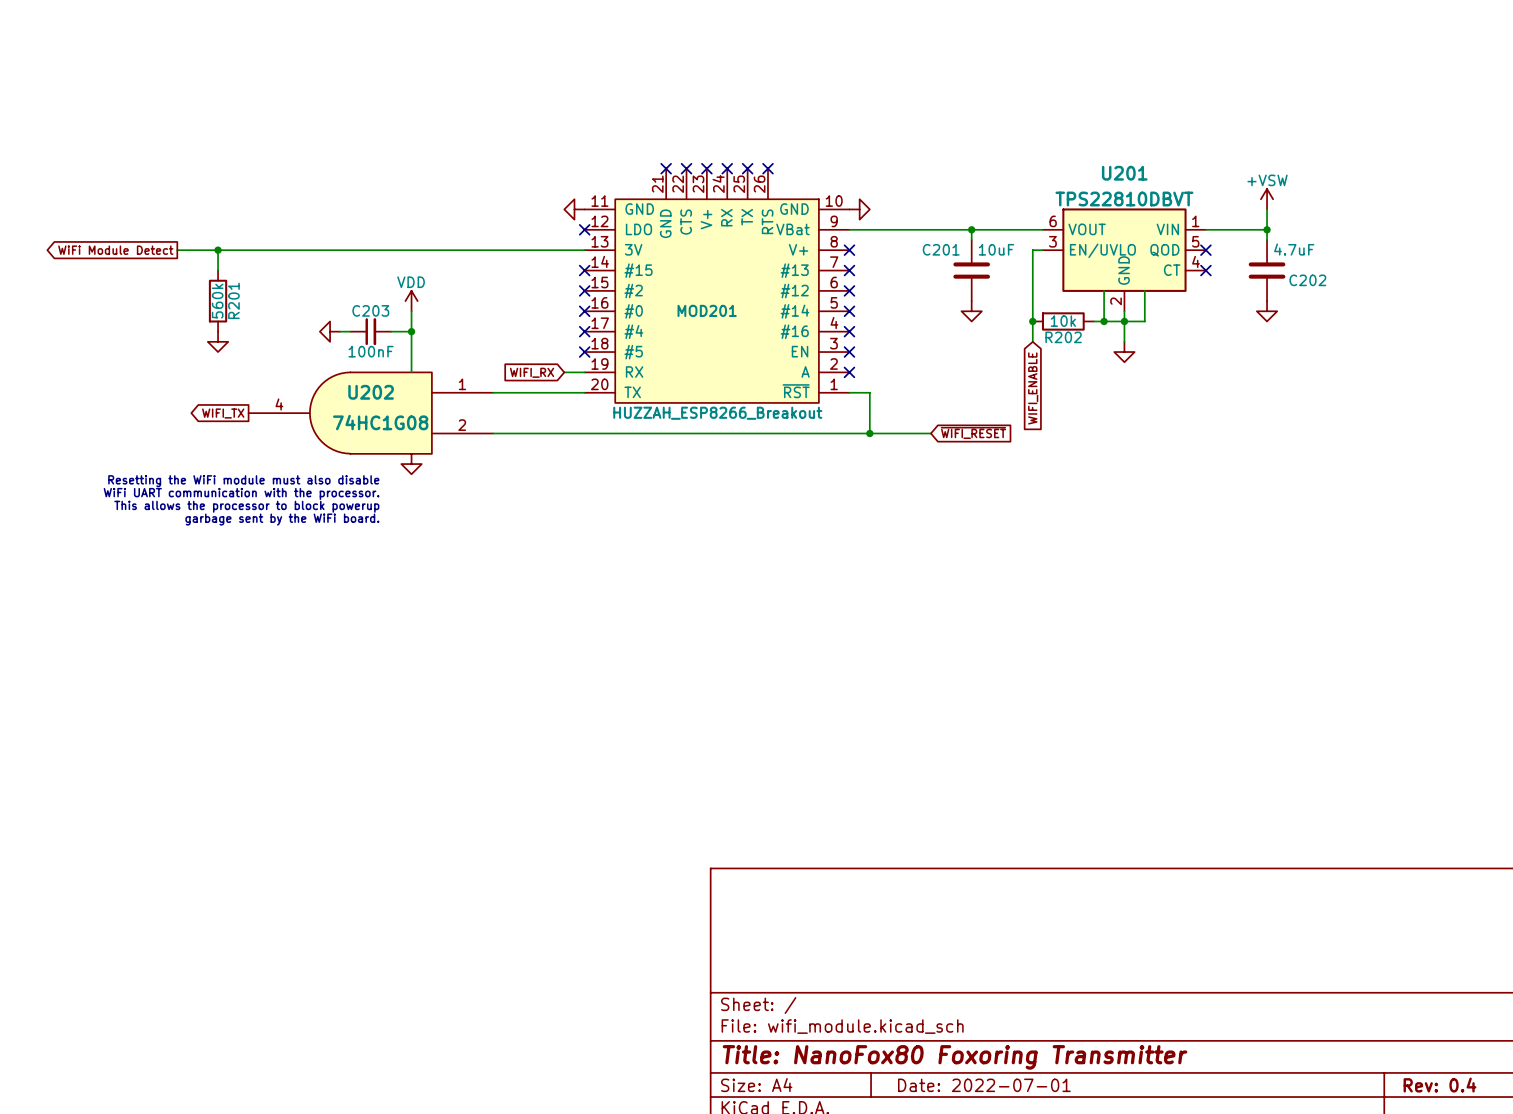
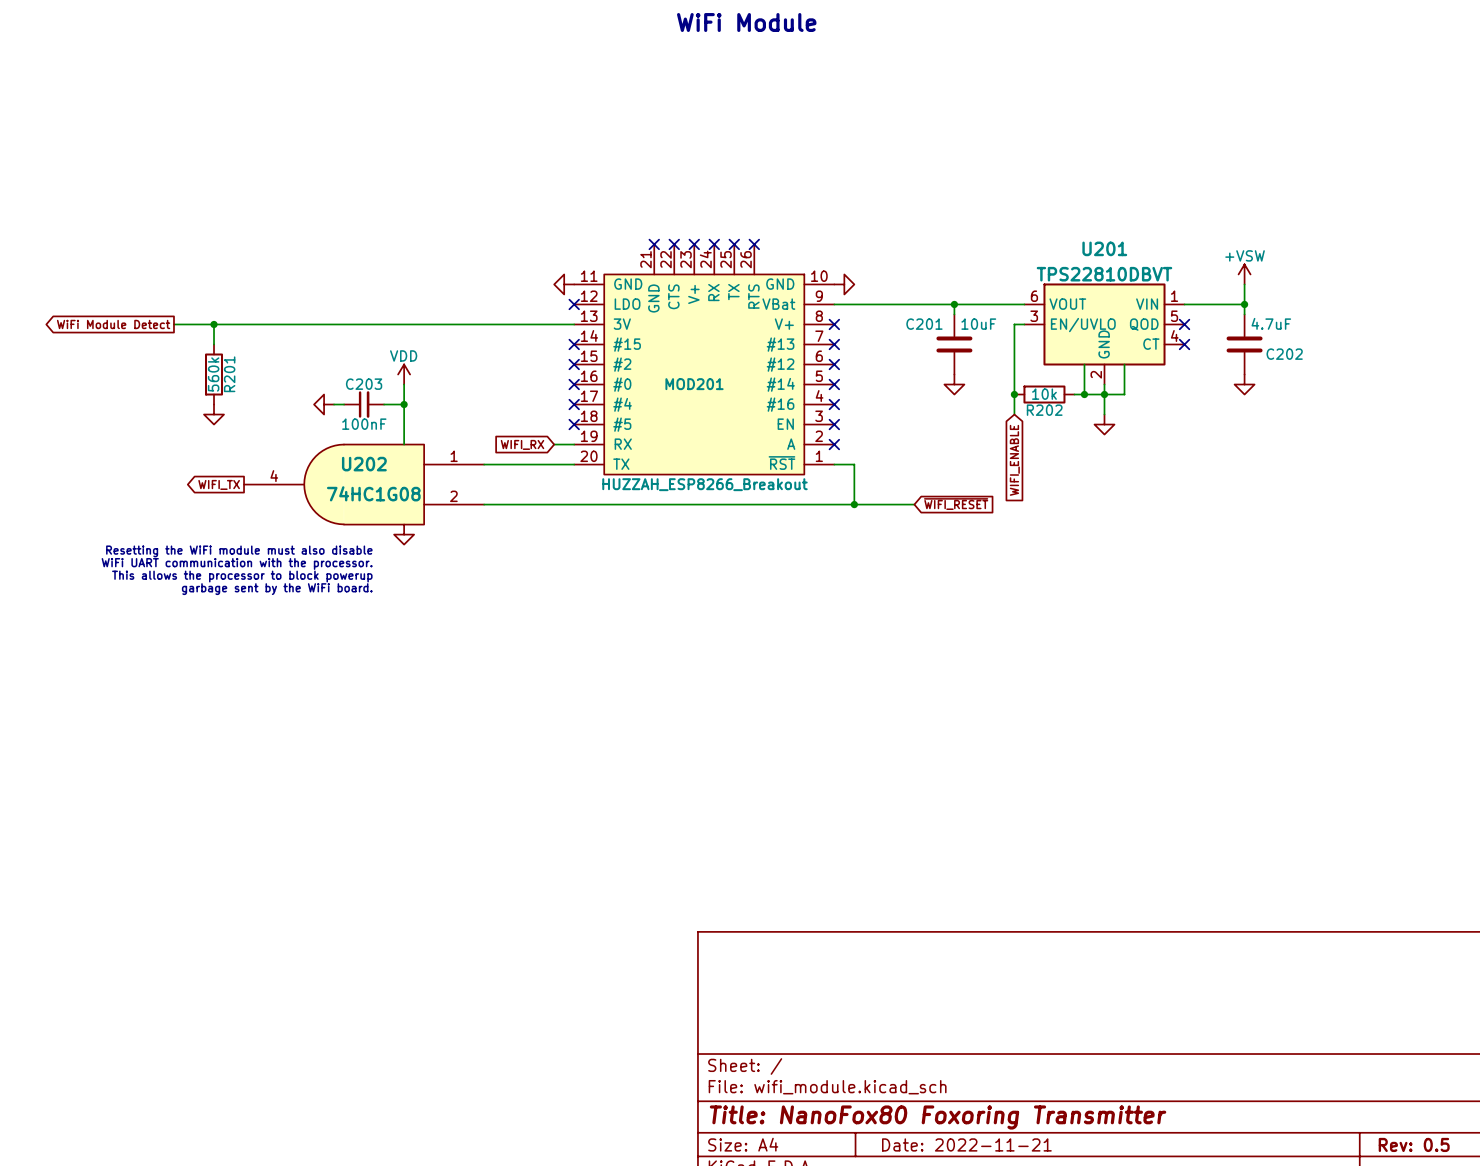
title block: Date: 2022-07-01 (984, 1085) -> Date: 2022-11-21 (966, 1144)
title block: Rev: 0.4 (1439, 1085) -> Rev: 0.5 (1414, 1144)

